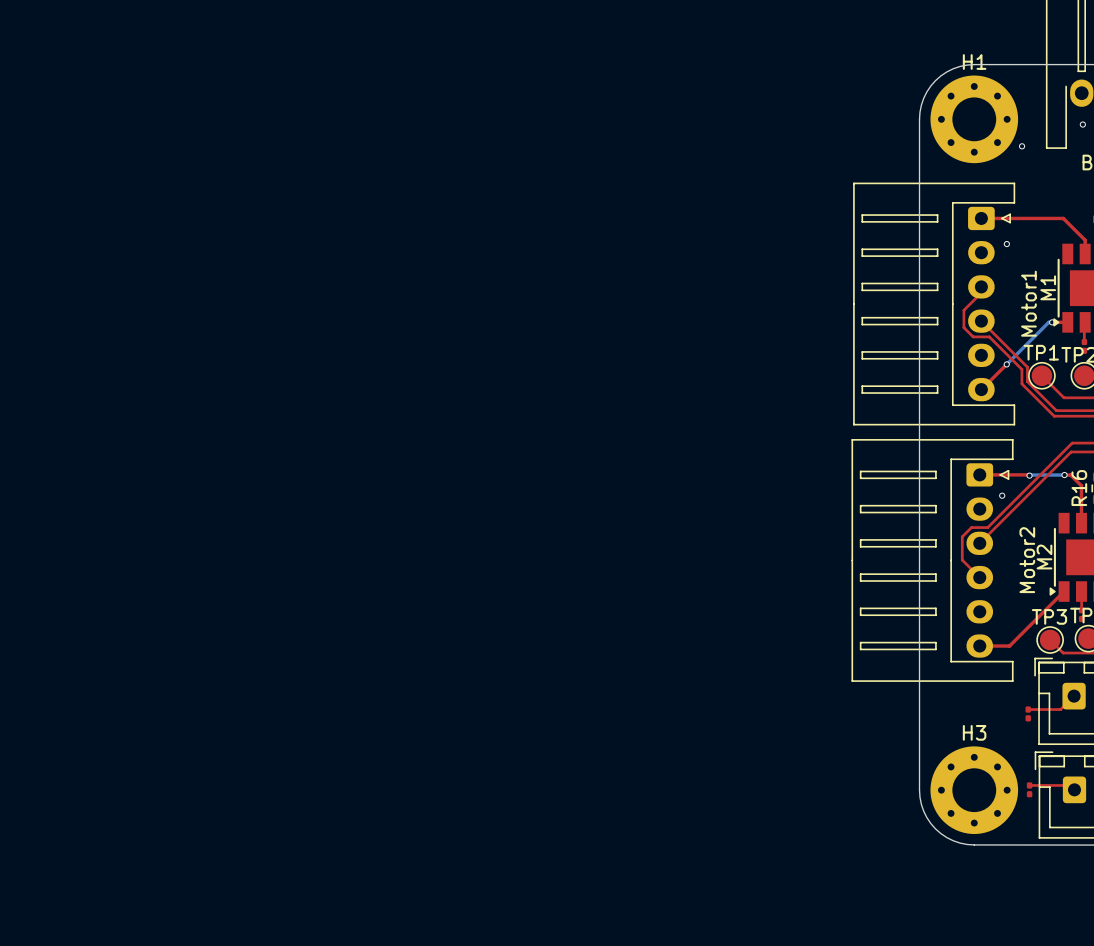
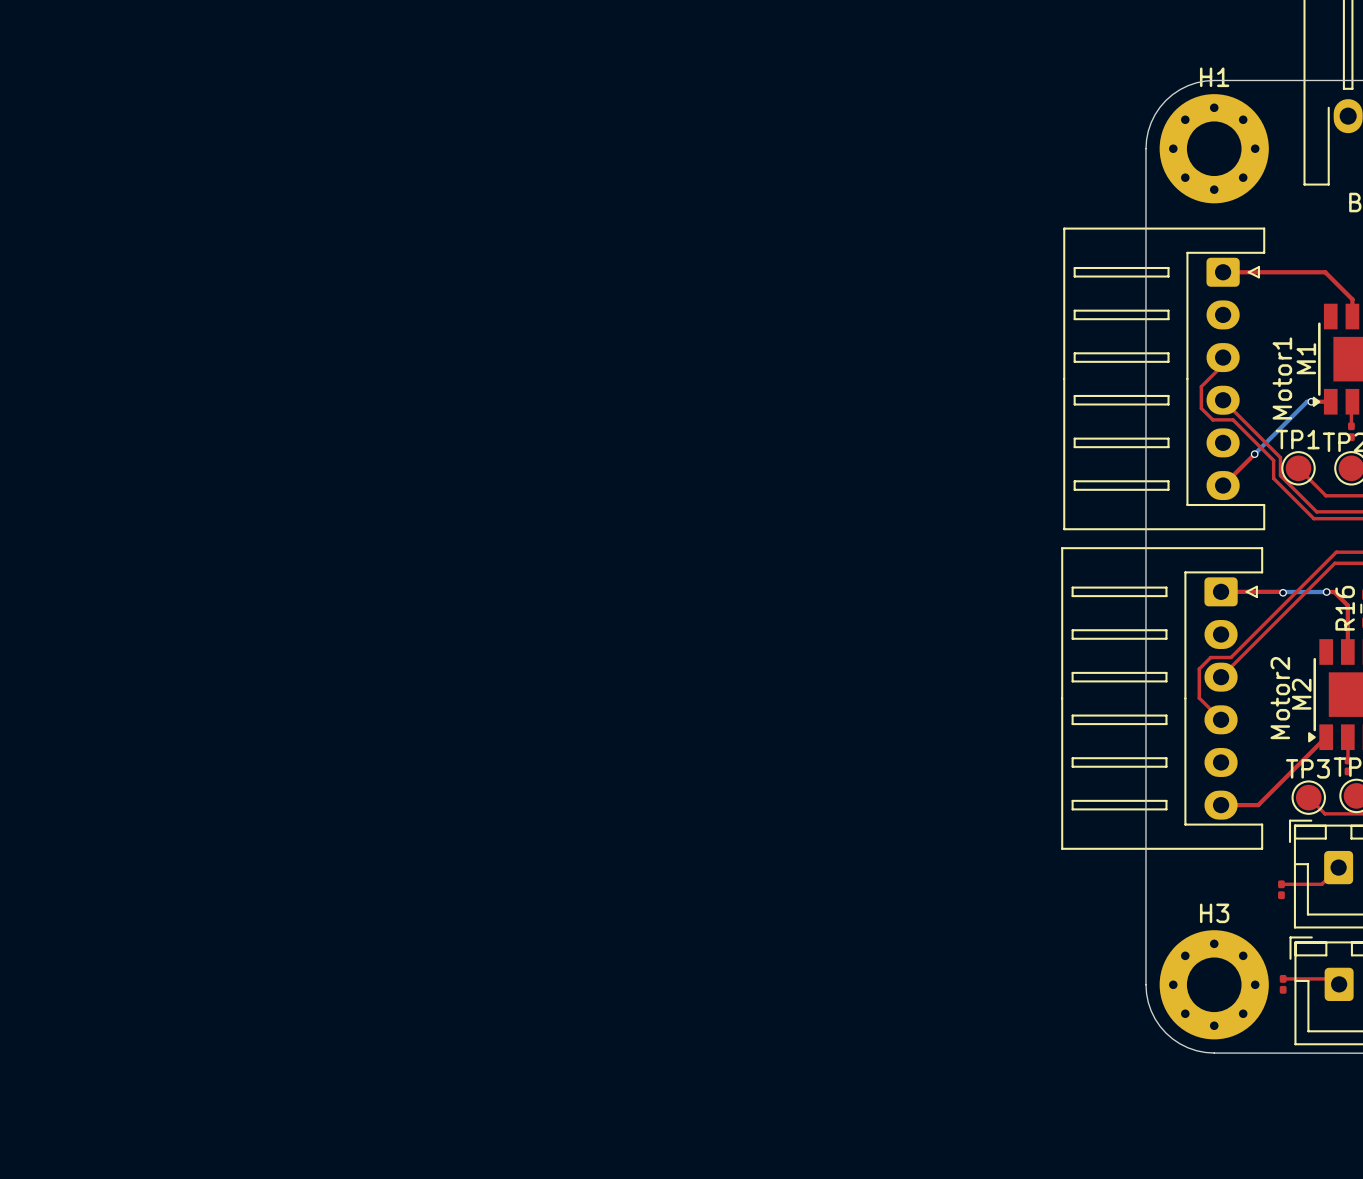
via: (1082, 124) -> none
via: (1022, 146) -> none
via: (1006, 244) -> none
via: (1002, 495) -> none

